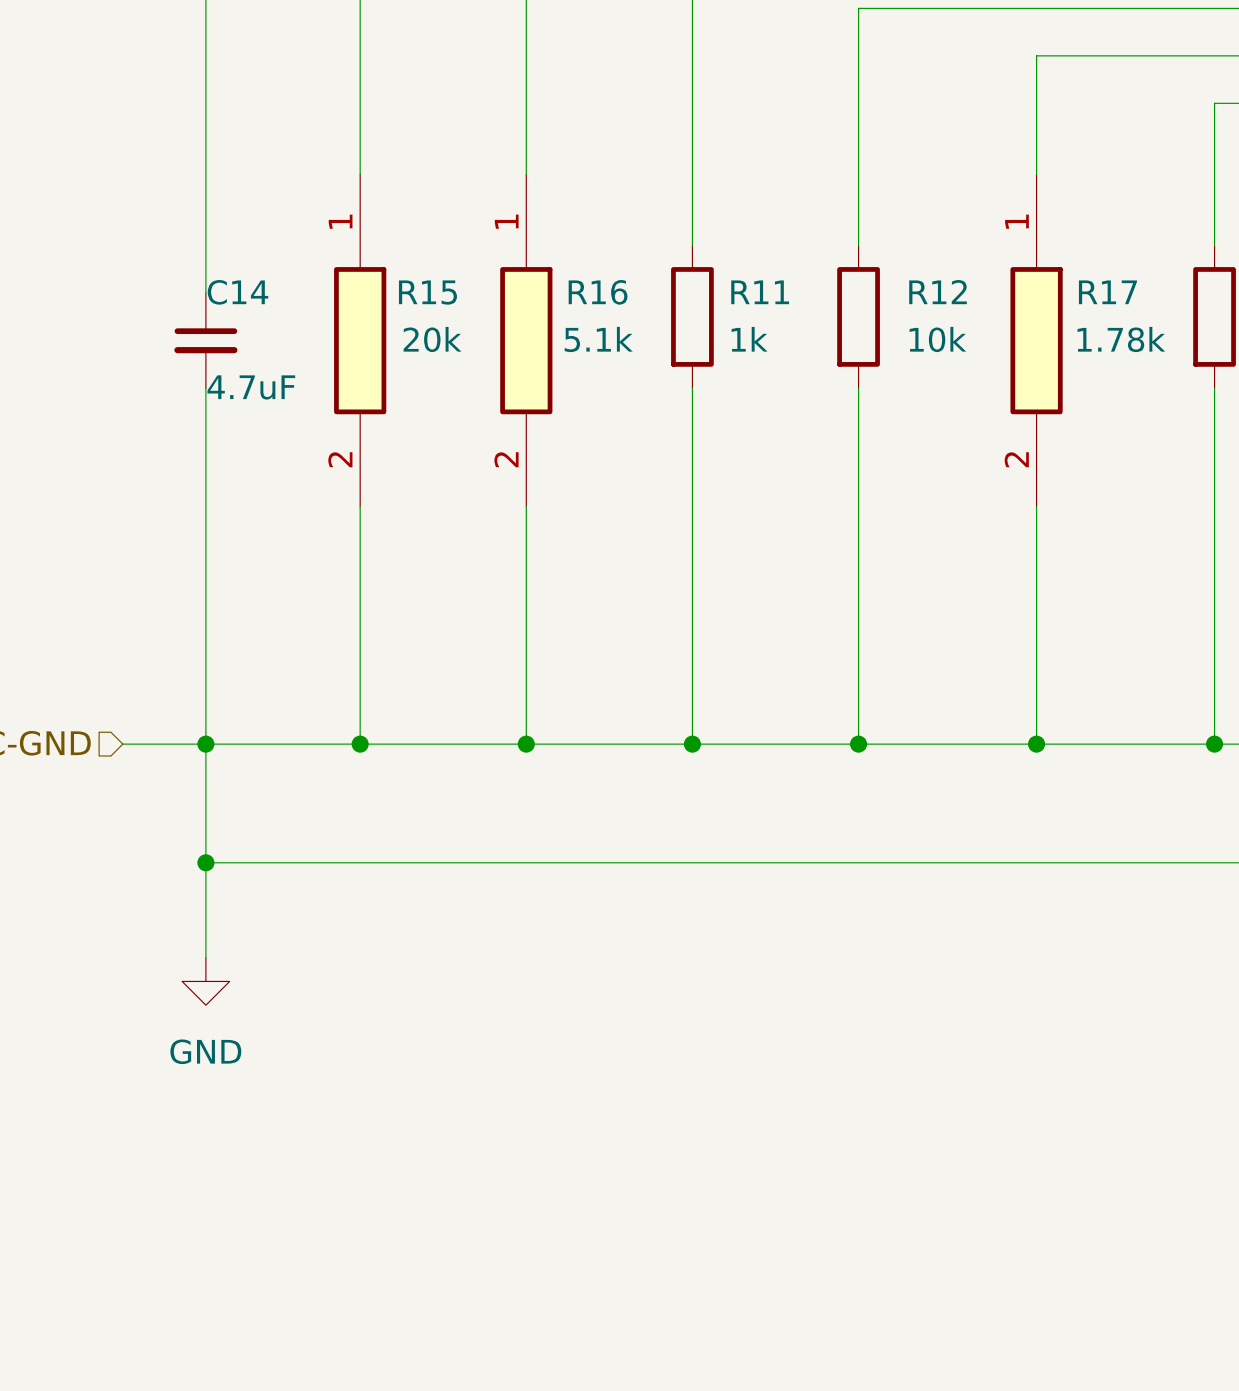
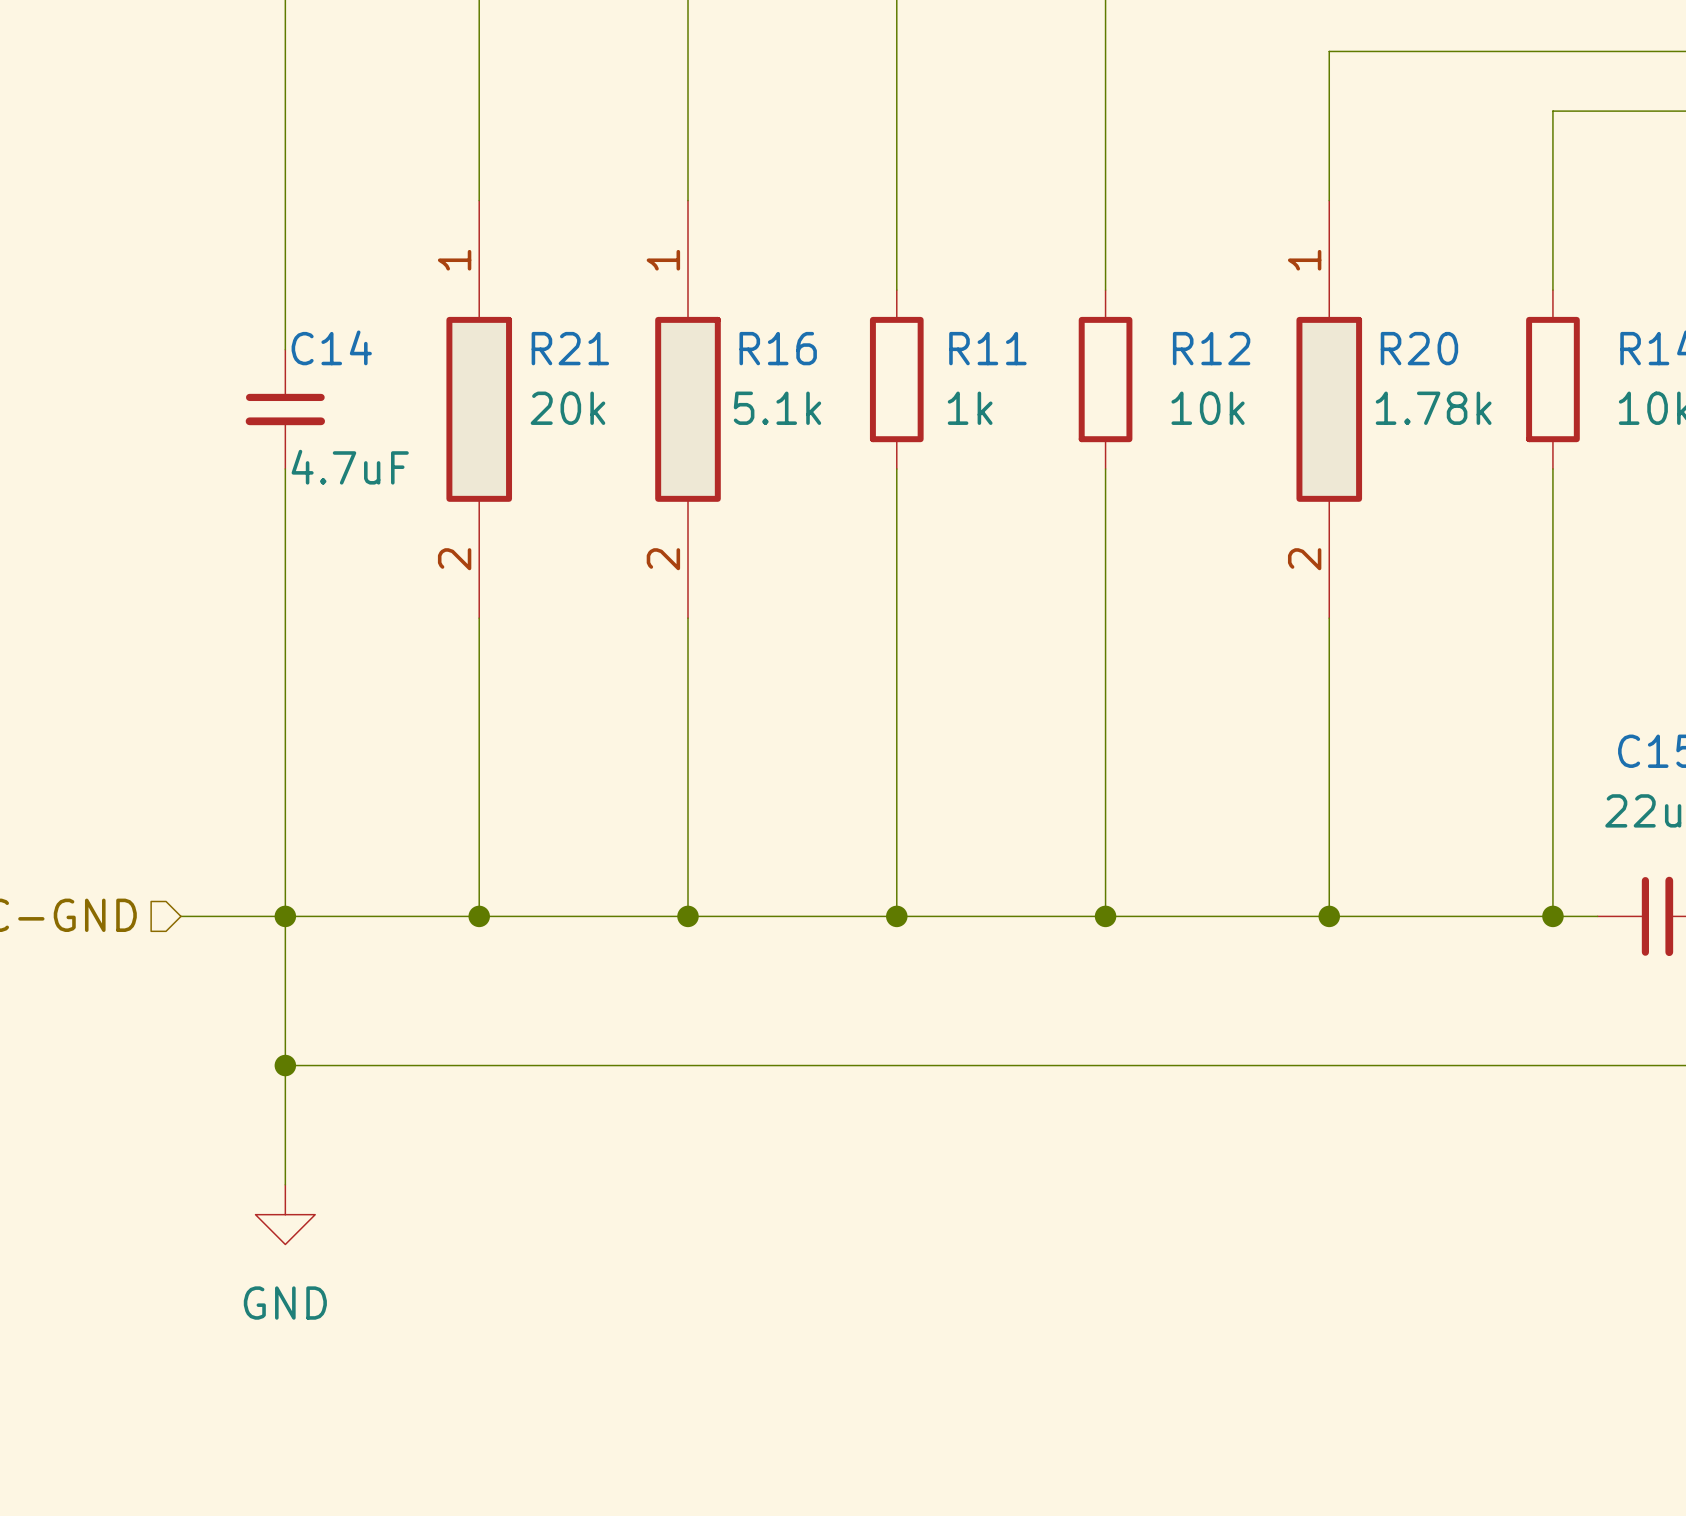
R15 name: R15 (427, 292) -> R21 (570, 348)
R17 name: R17 (1107, 292) -> R20 (1419, 348)

